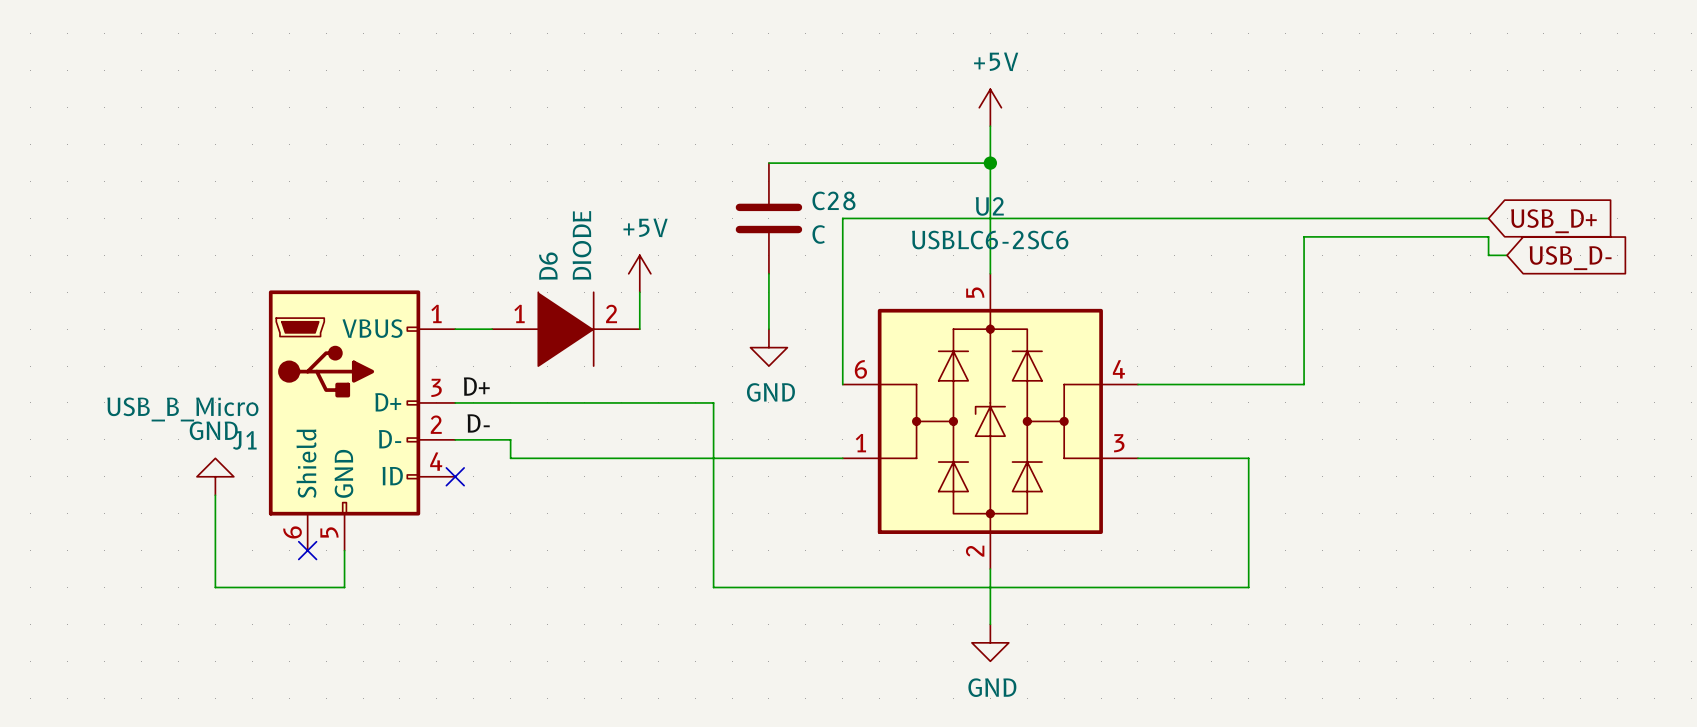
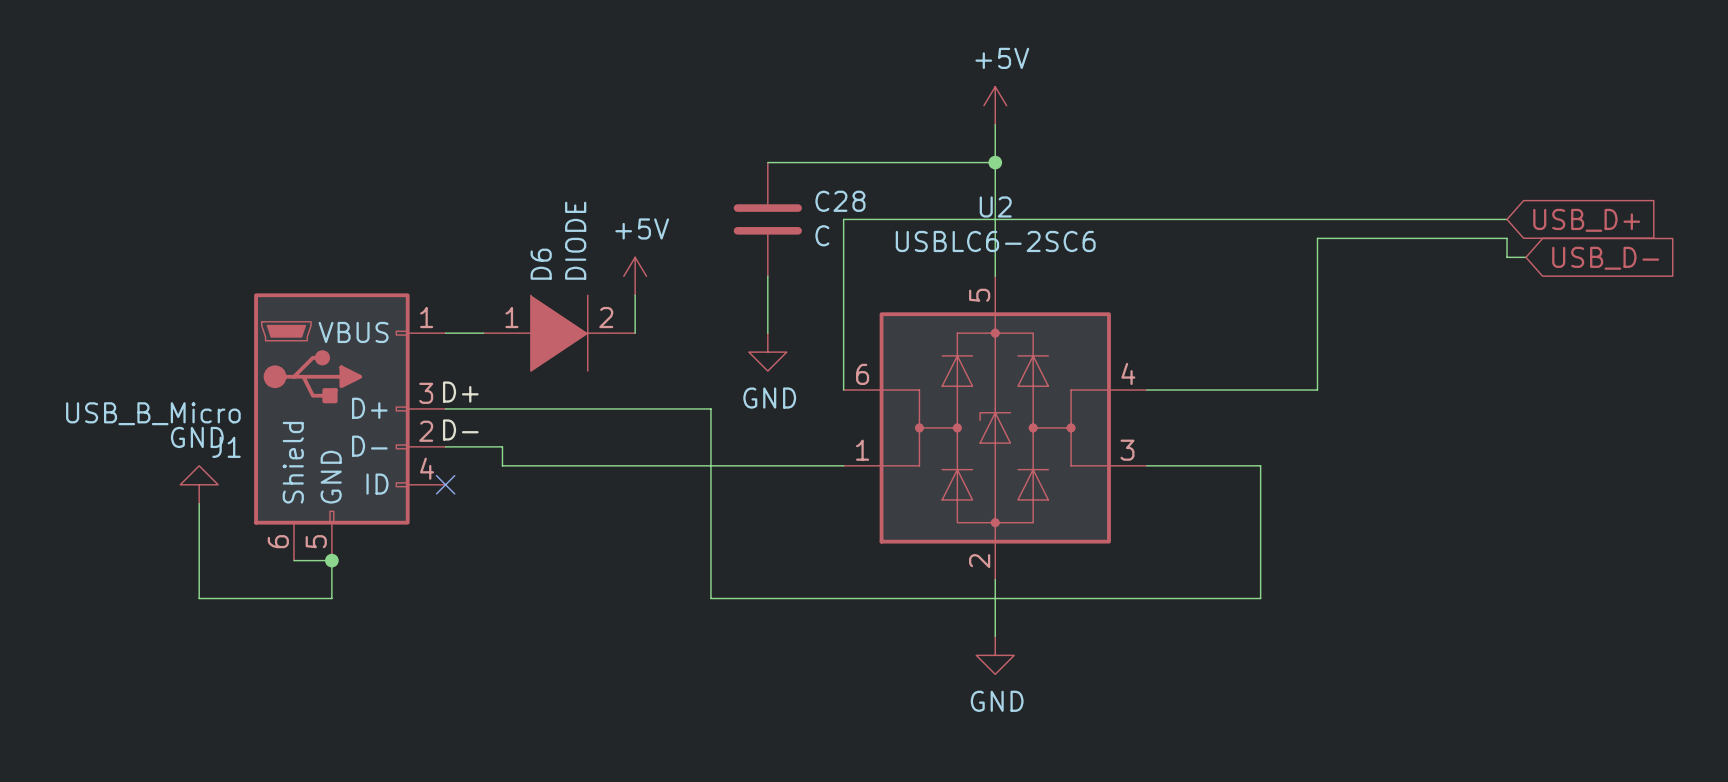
wire: none -> (293, 560) (331, 560)
no-connect mark: (307, 550) -> none
junction: none -> (331, 560)

